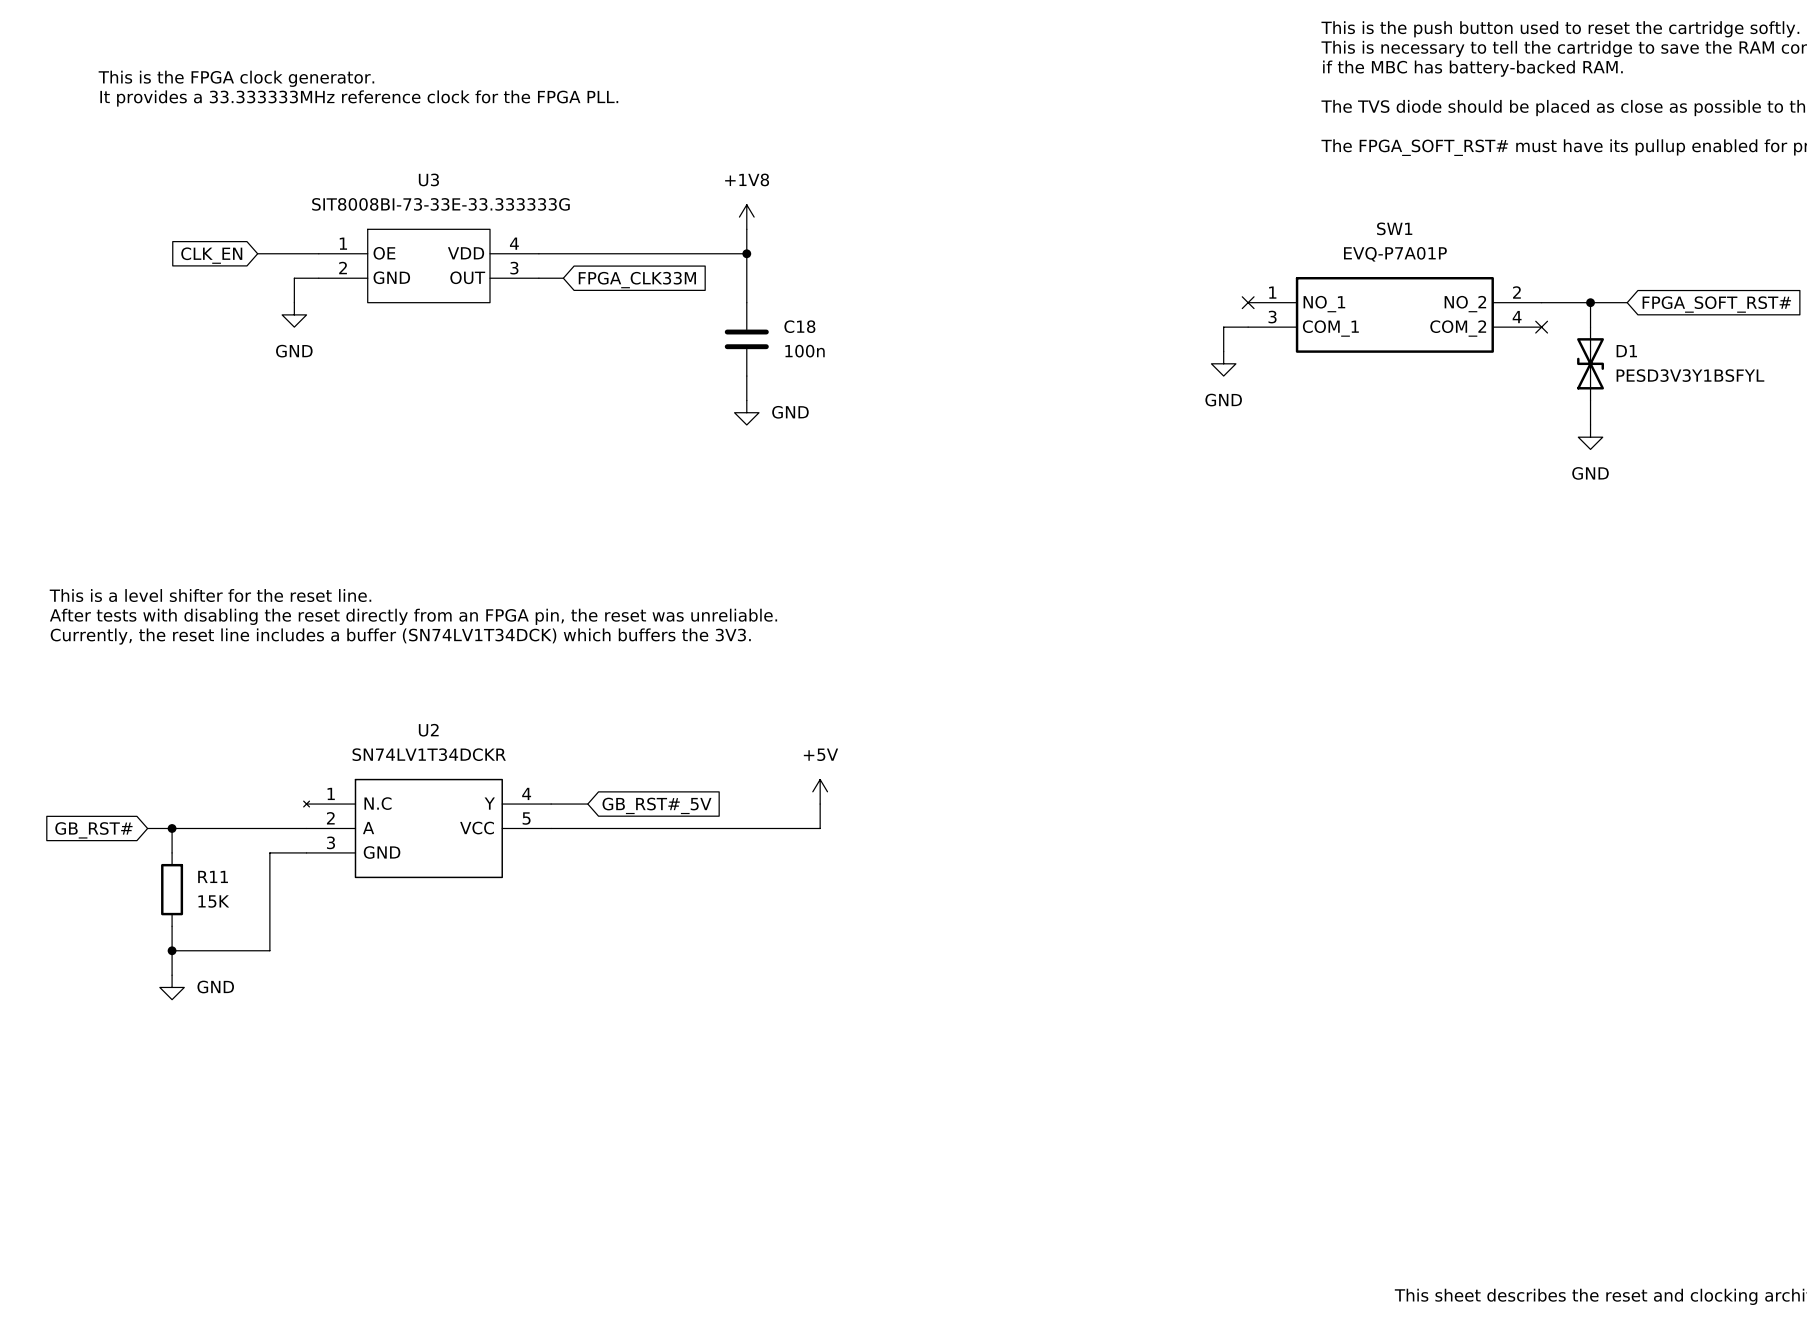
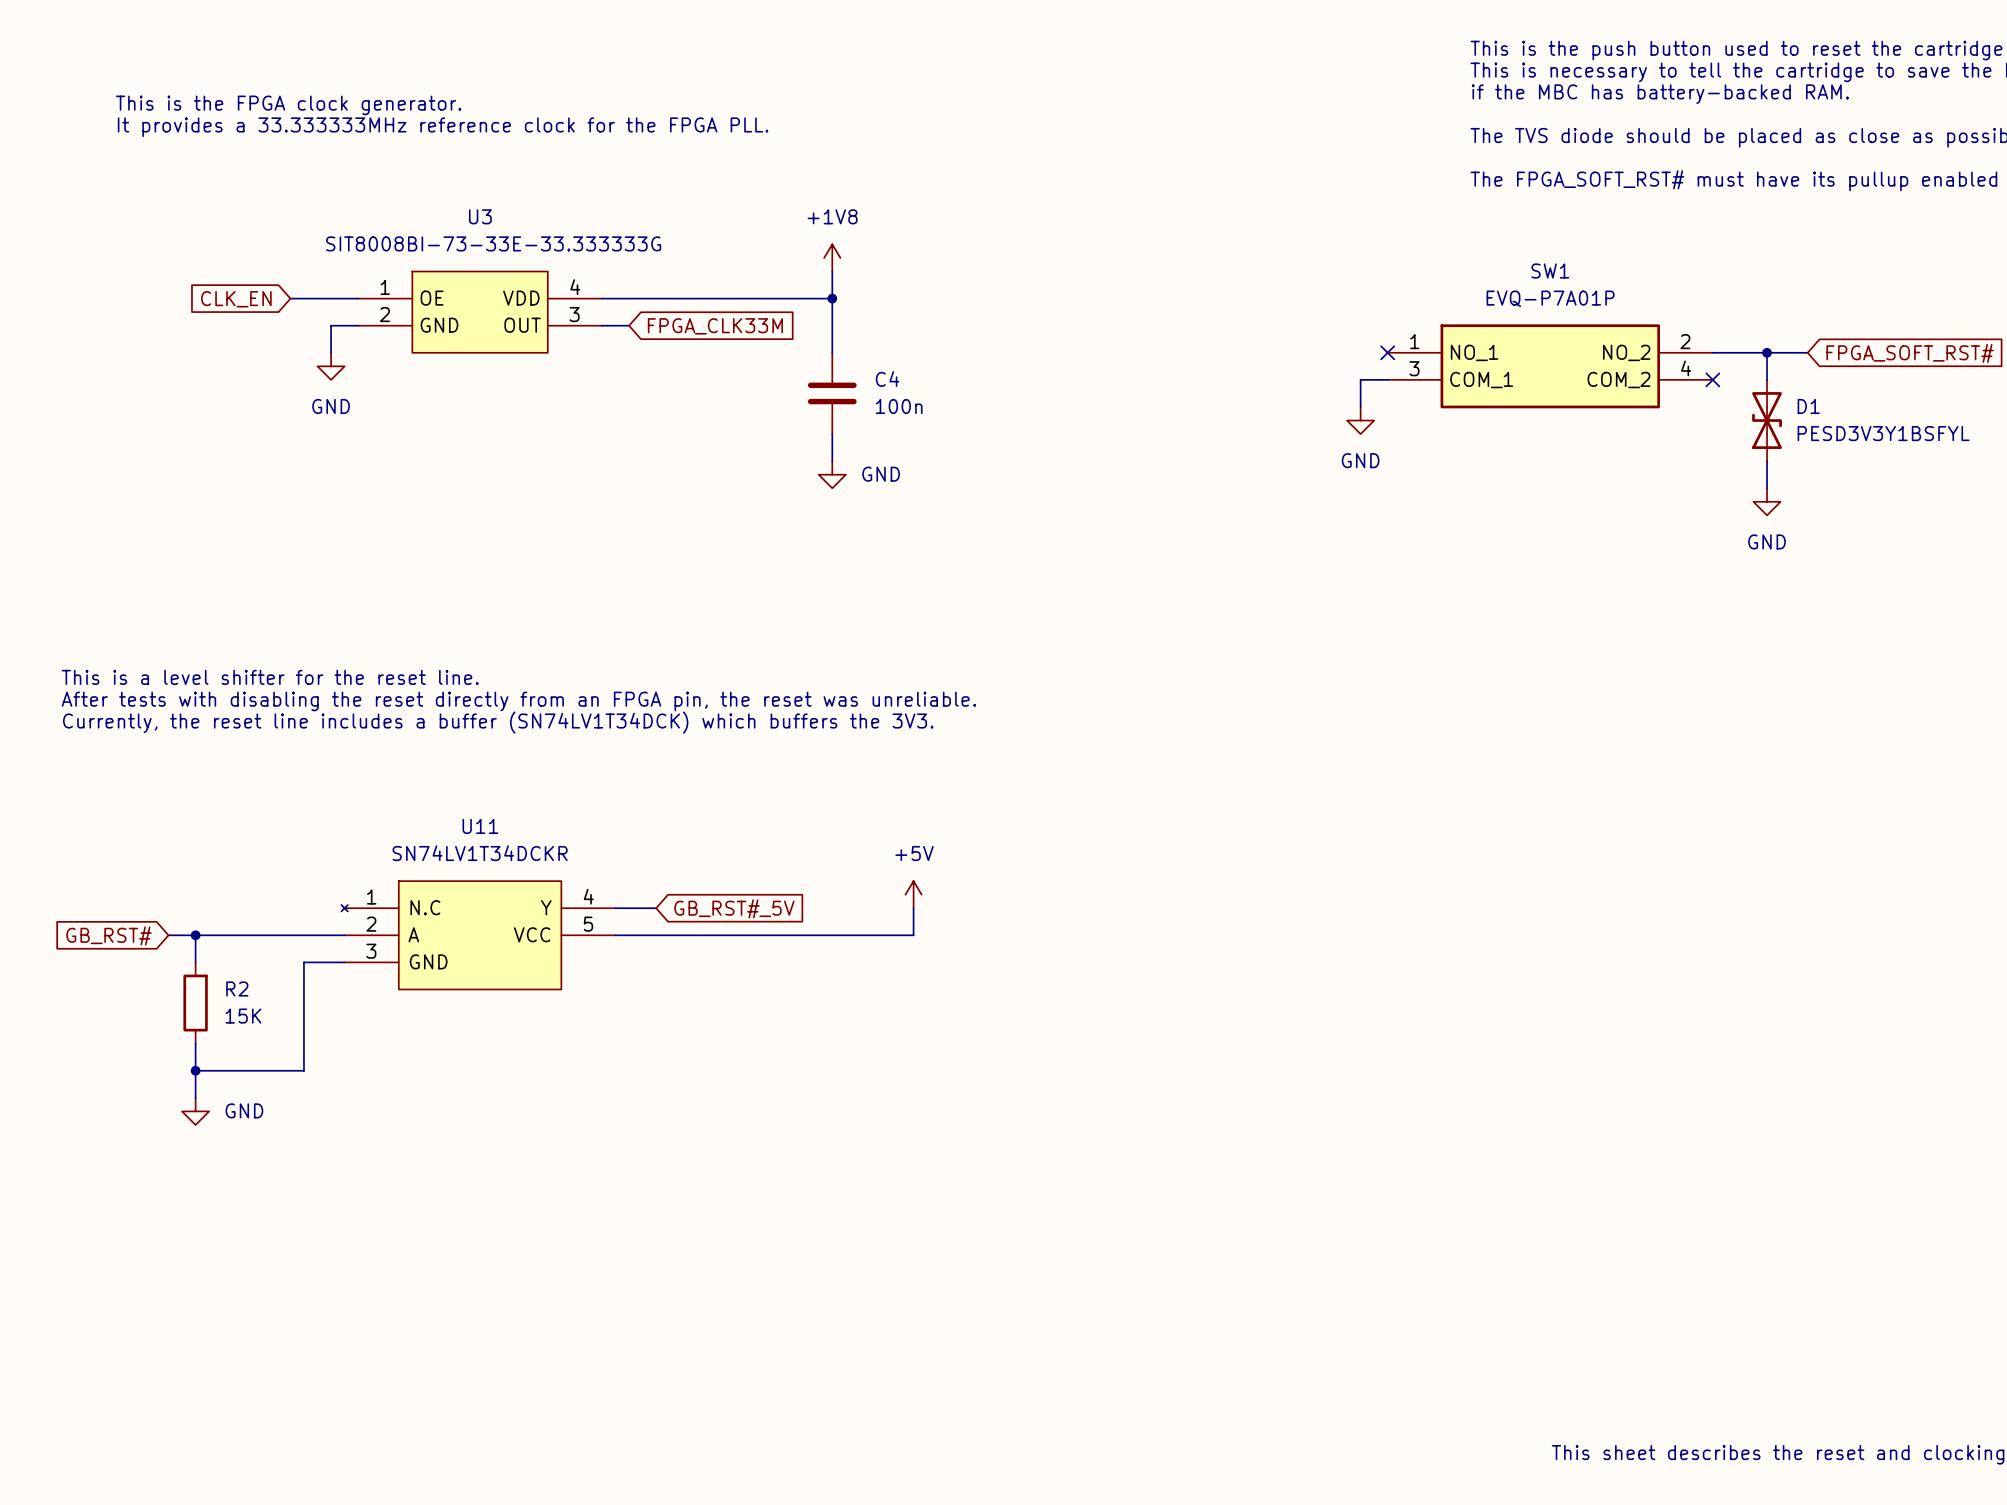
C18 name: C18 (799, 326) -> C4 (887, 379)
U2 name: U2 (428, 730) -> U11 (480, 826)
R11 name: R11 (213, 876) -> R2 (237, 988)

